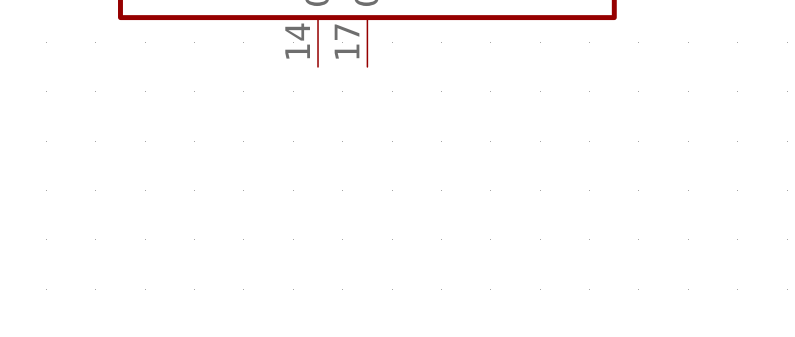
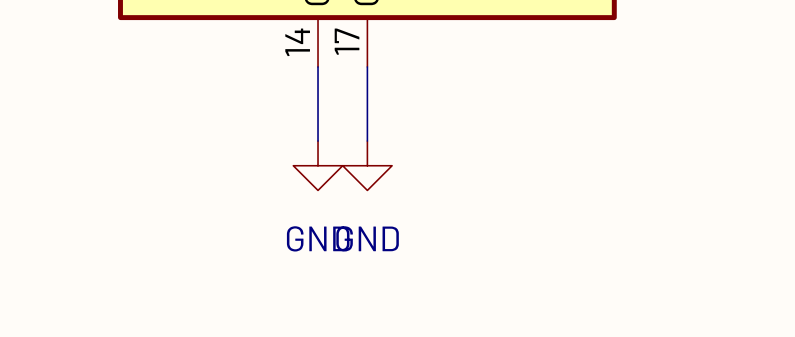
wire: none -> (318, 66) (318, 141)
wire: none -> (367, 66) (367, 141)
power symbol: none -> GND (318, 165)
power symbol: none -> GND (367, 165)

